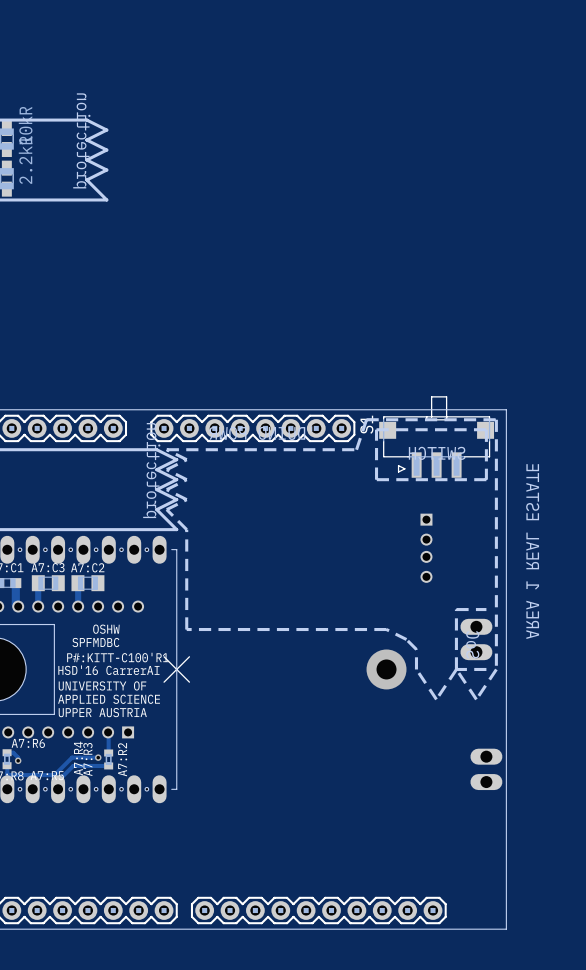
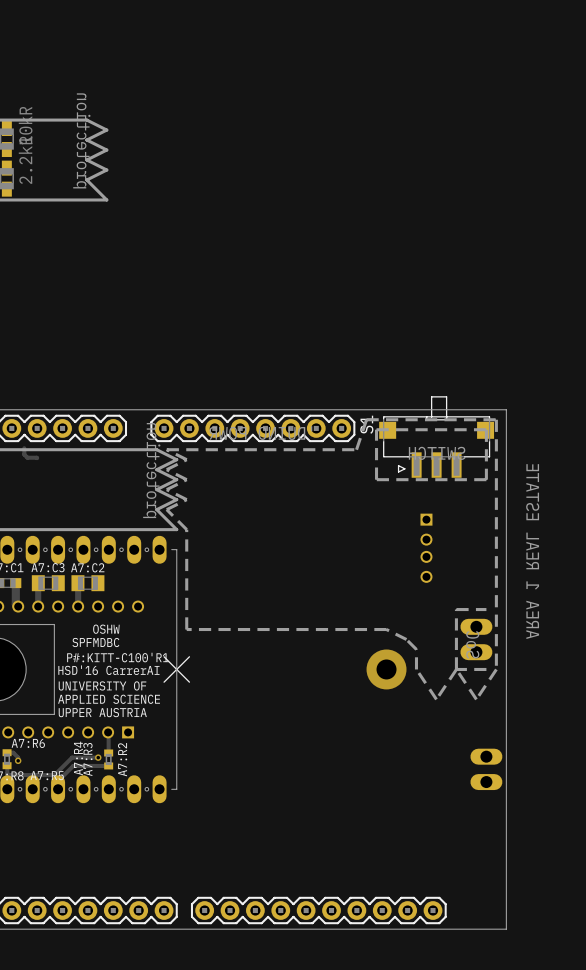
track: none -> (24, 448) (24, 454) (27, 457) (37, 458)

